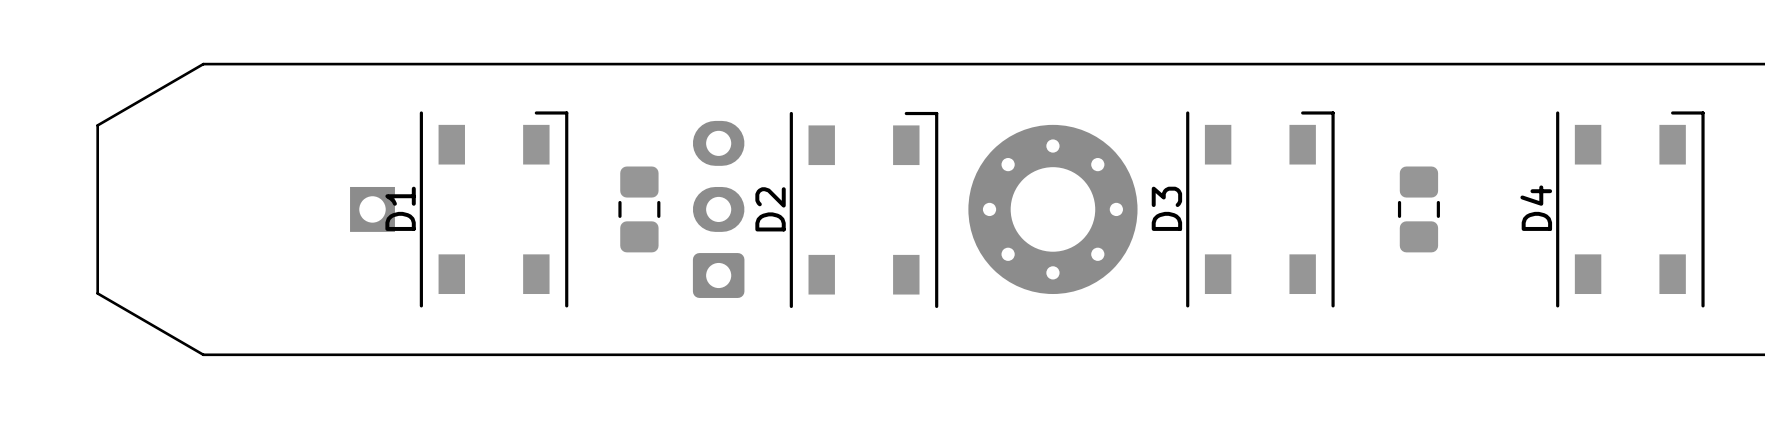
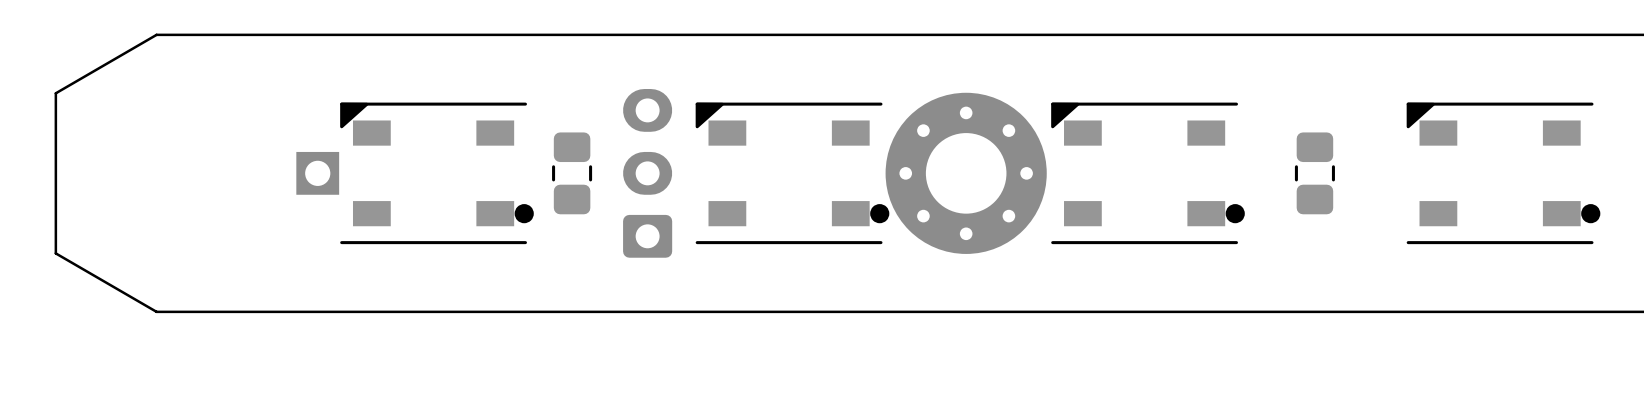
D1: (494, 209) -> none
part: none -> (436, 173)
D2: (864, 209) -> none
part: none -> (792, 173)
part: none -> (1147, 173)
D3: (1260, 209) -> none
part: none -> (1503, 173)
D4: (1630, 209) -> none

